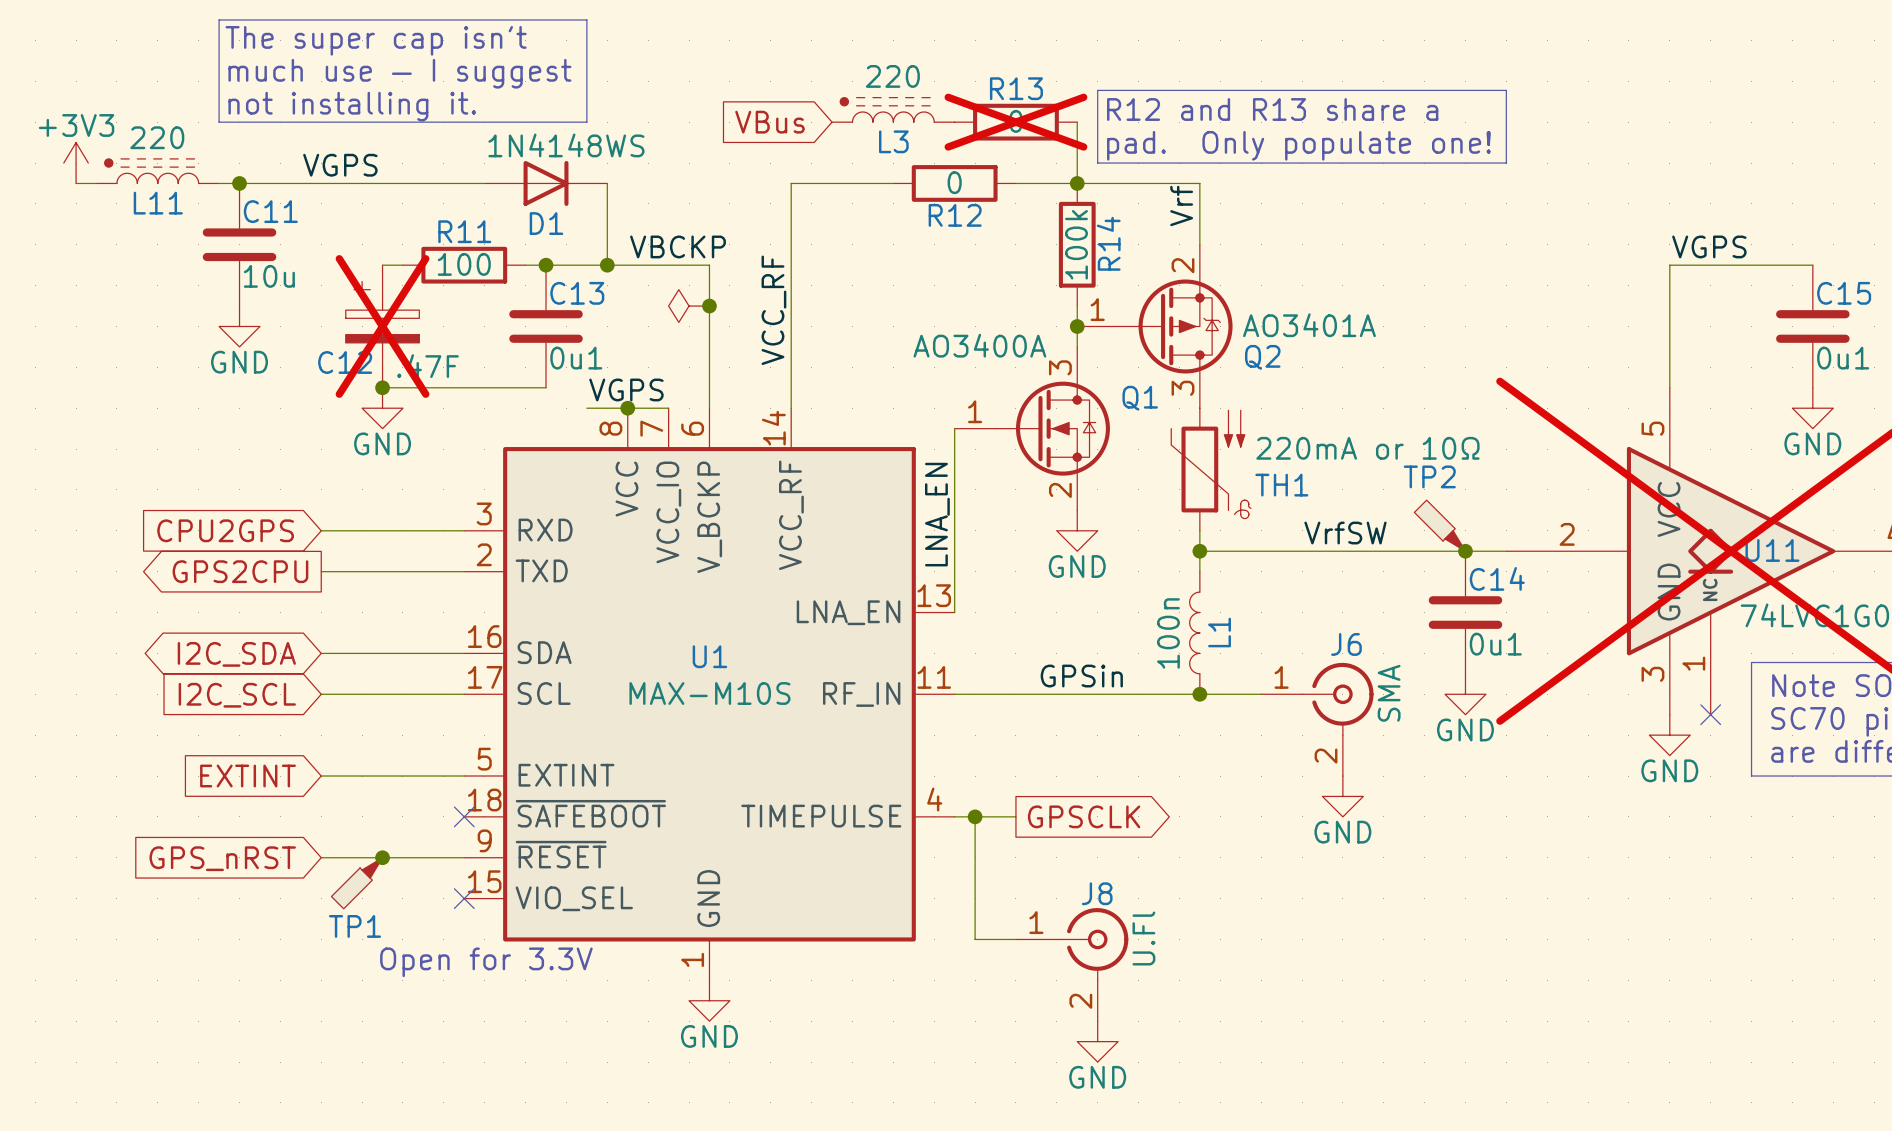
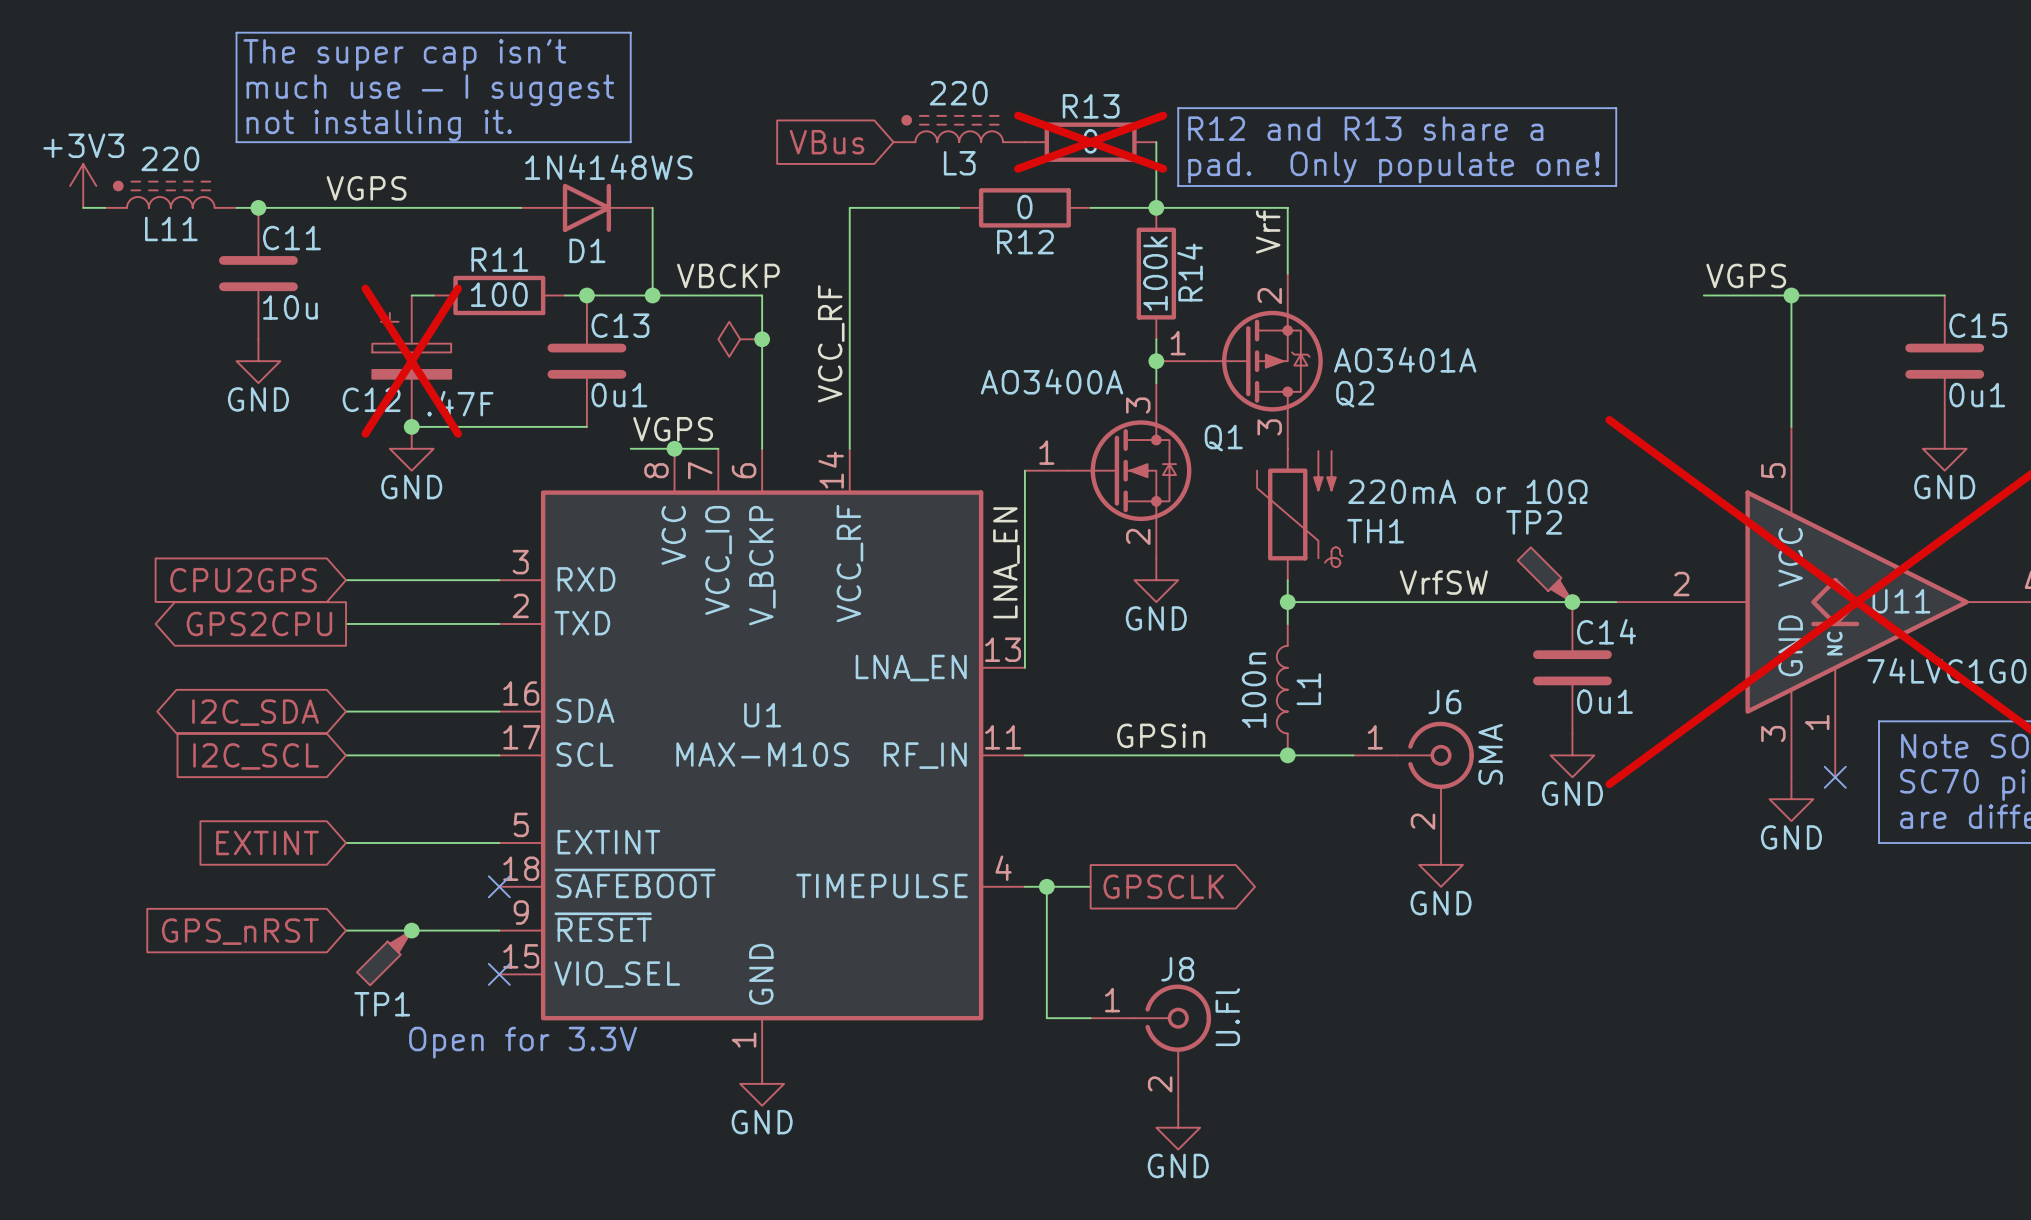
label position: VGPS (1709, 246) -> VGPS (1746, 275)
wire: none -> (1703, 295) (1791, 295)
junction: none -> (1791, 295)

